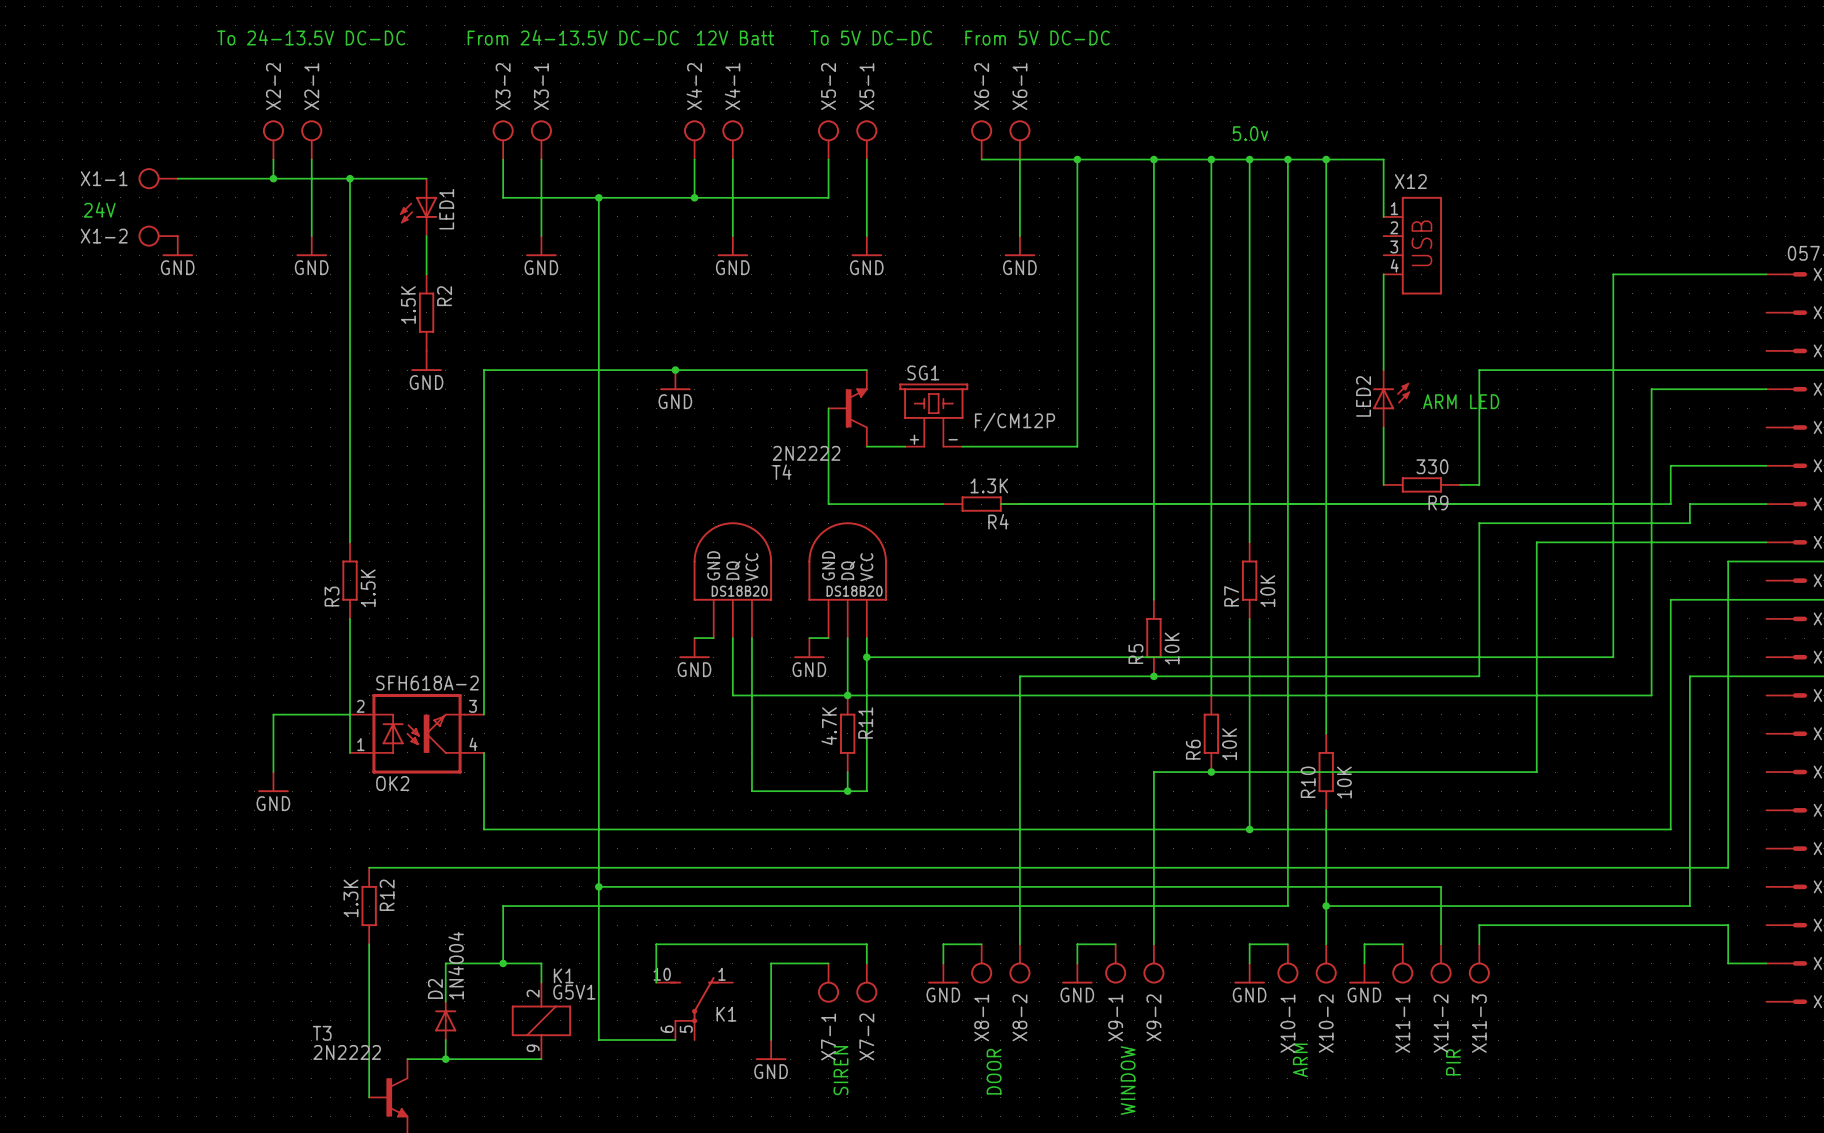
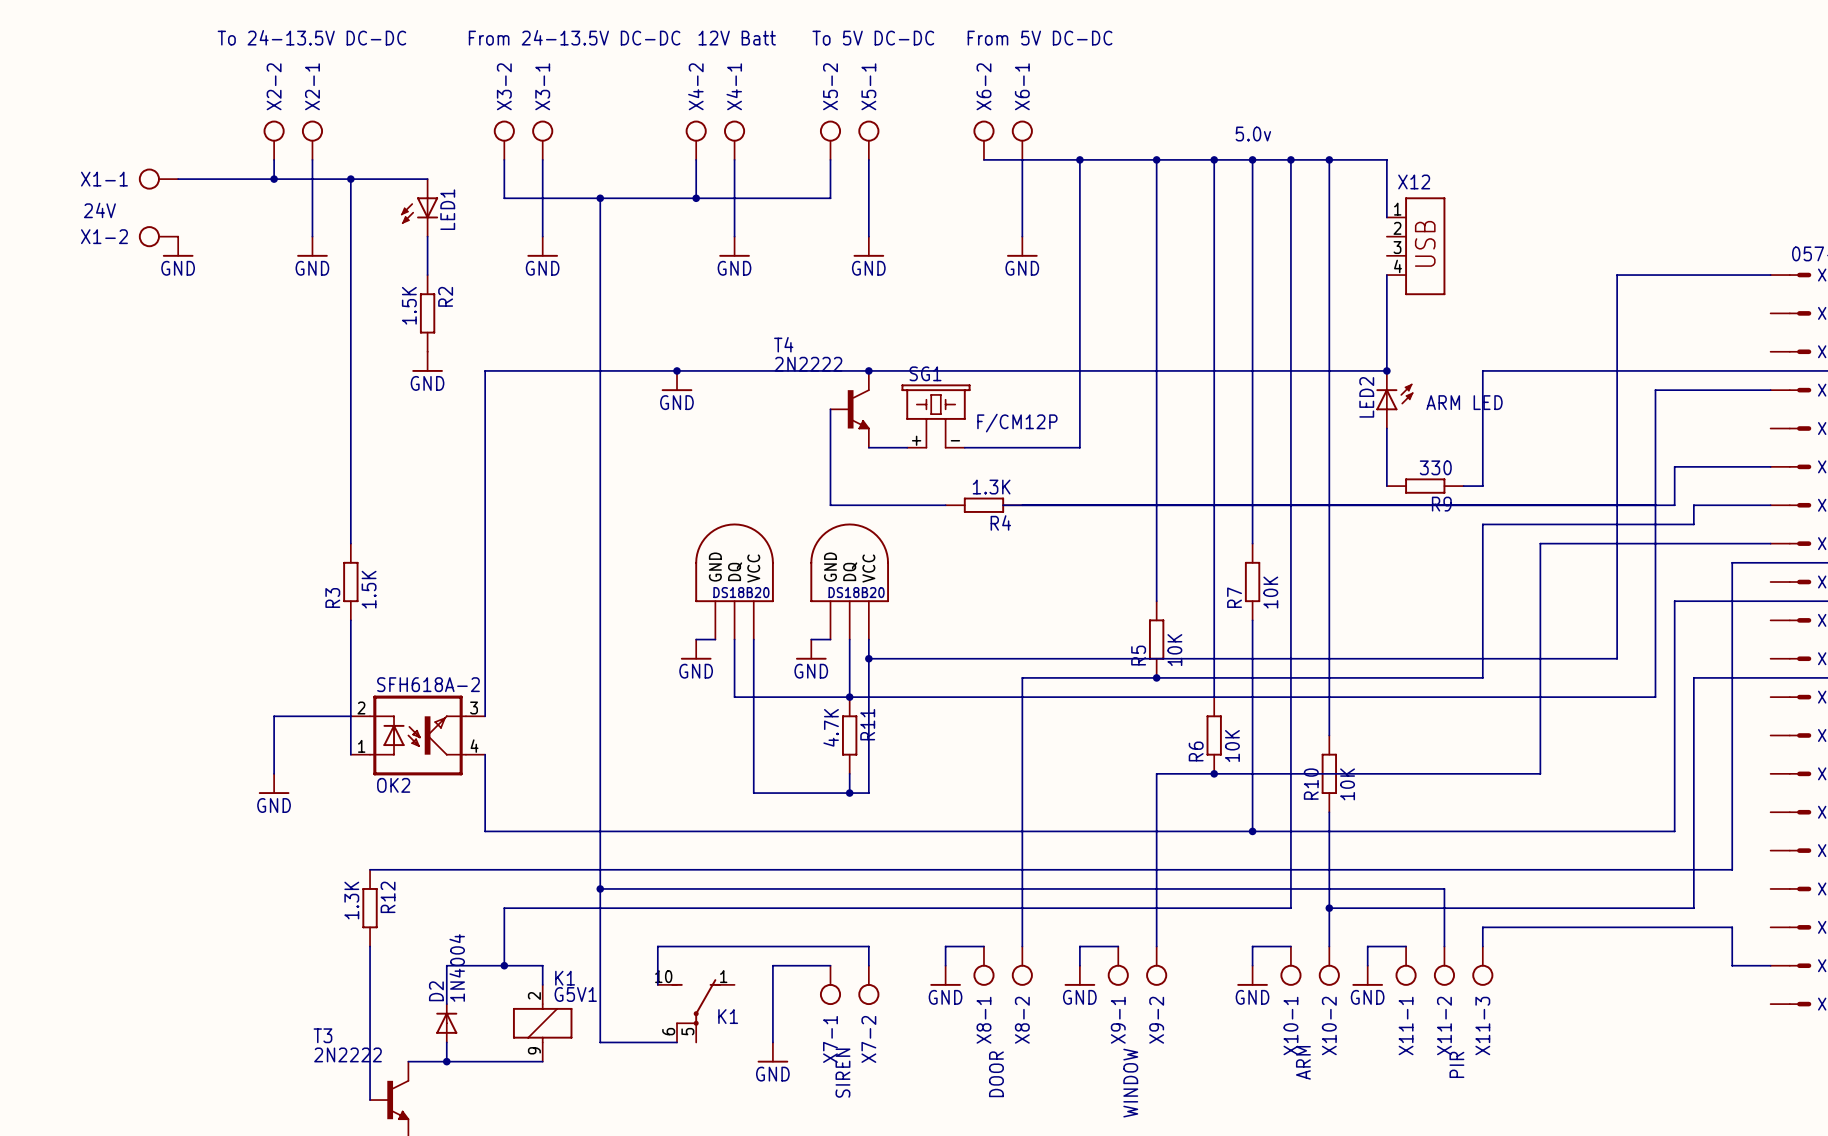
wire: none -> (868, 370) (1386, 370)
junction: none -> (868, 370)
junction: none -> (1386, 370)
T4 flip: as is (856, 408) -> up-down (858, 409)

